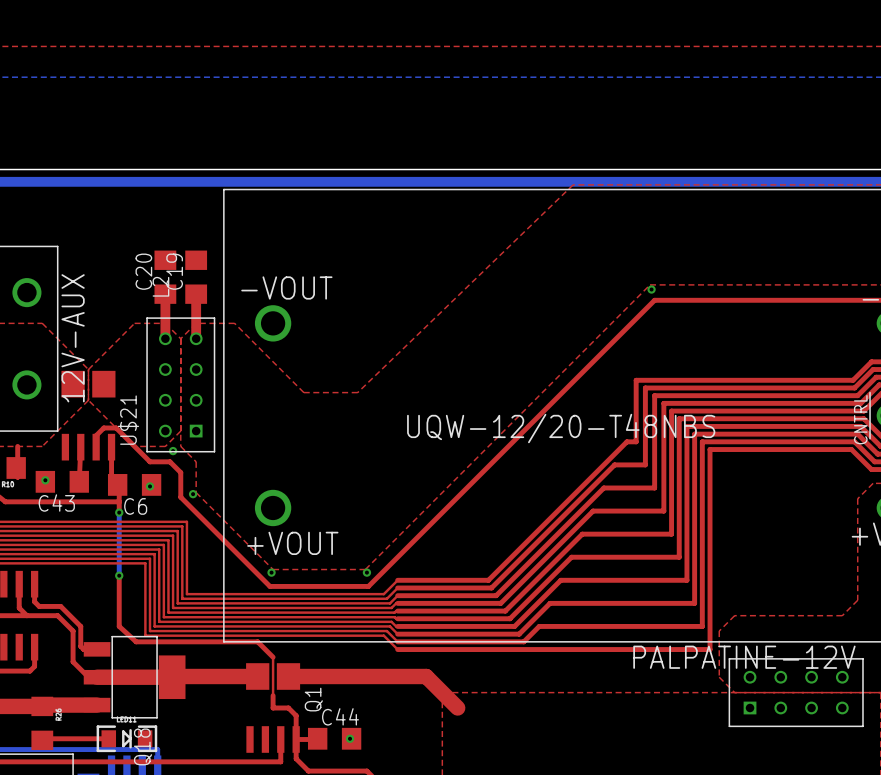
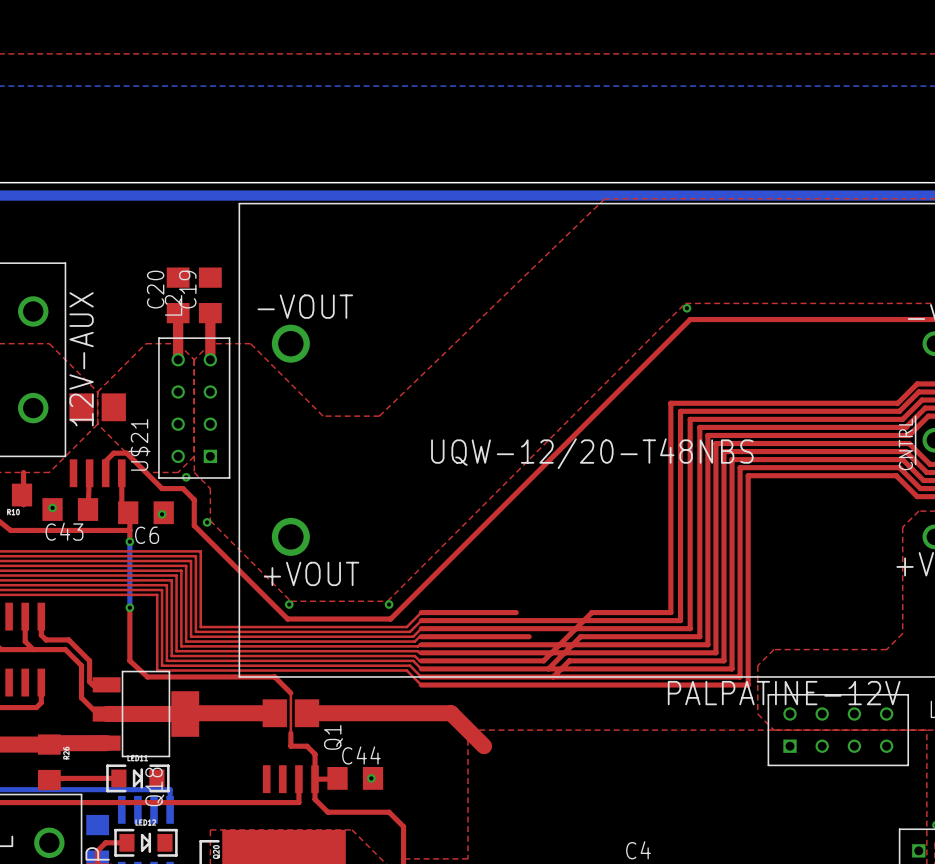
top track: (636, 441) (626, 441) (488, 580) -> none
top track: (645, 464) (614, 464) (491, 587) -> (680, 491) (680, 620) (519, 620)
top track: (654, 487) (603, 487) (496, 595) -> (690, 515) (690, 628) (524, 628)
top track: (663, 511) (593, 511) (500, 603) -> none
top track: (671, 534) (582, 534) (505, 611) -> (707, 564) (707, 644) (534, 644)
top track: (679, 557) (571, 557) (510, 618) -> (715, 588) (715, 652) (538, 652)
top track: (636, 580) (686, 580) -> (670, 612) (670, 467)
top track: (663, 603) (694, 603) -> (699, 636) (699, 540)
top track: none -> (732, 636) (732, 668) (548, 668)
top track: (686, 626) (702, 626) -> (723, 660) (723, 612)
top track: none -> (740, 660) (740, 676) (553, 676)

